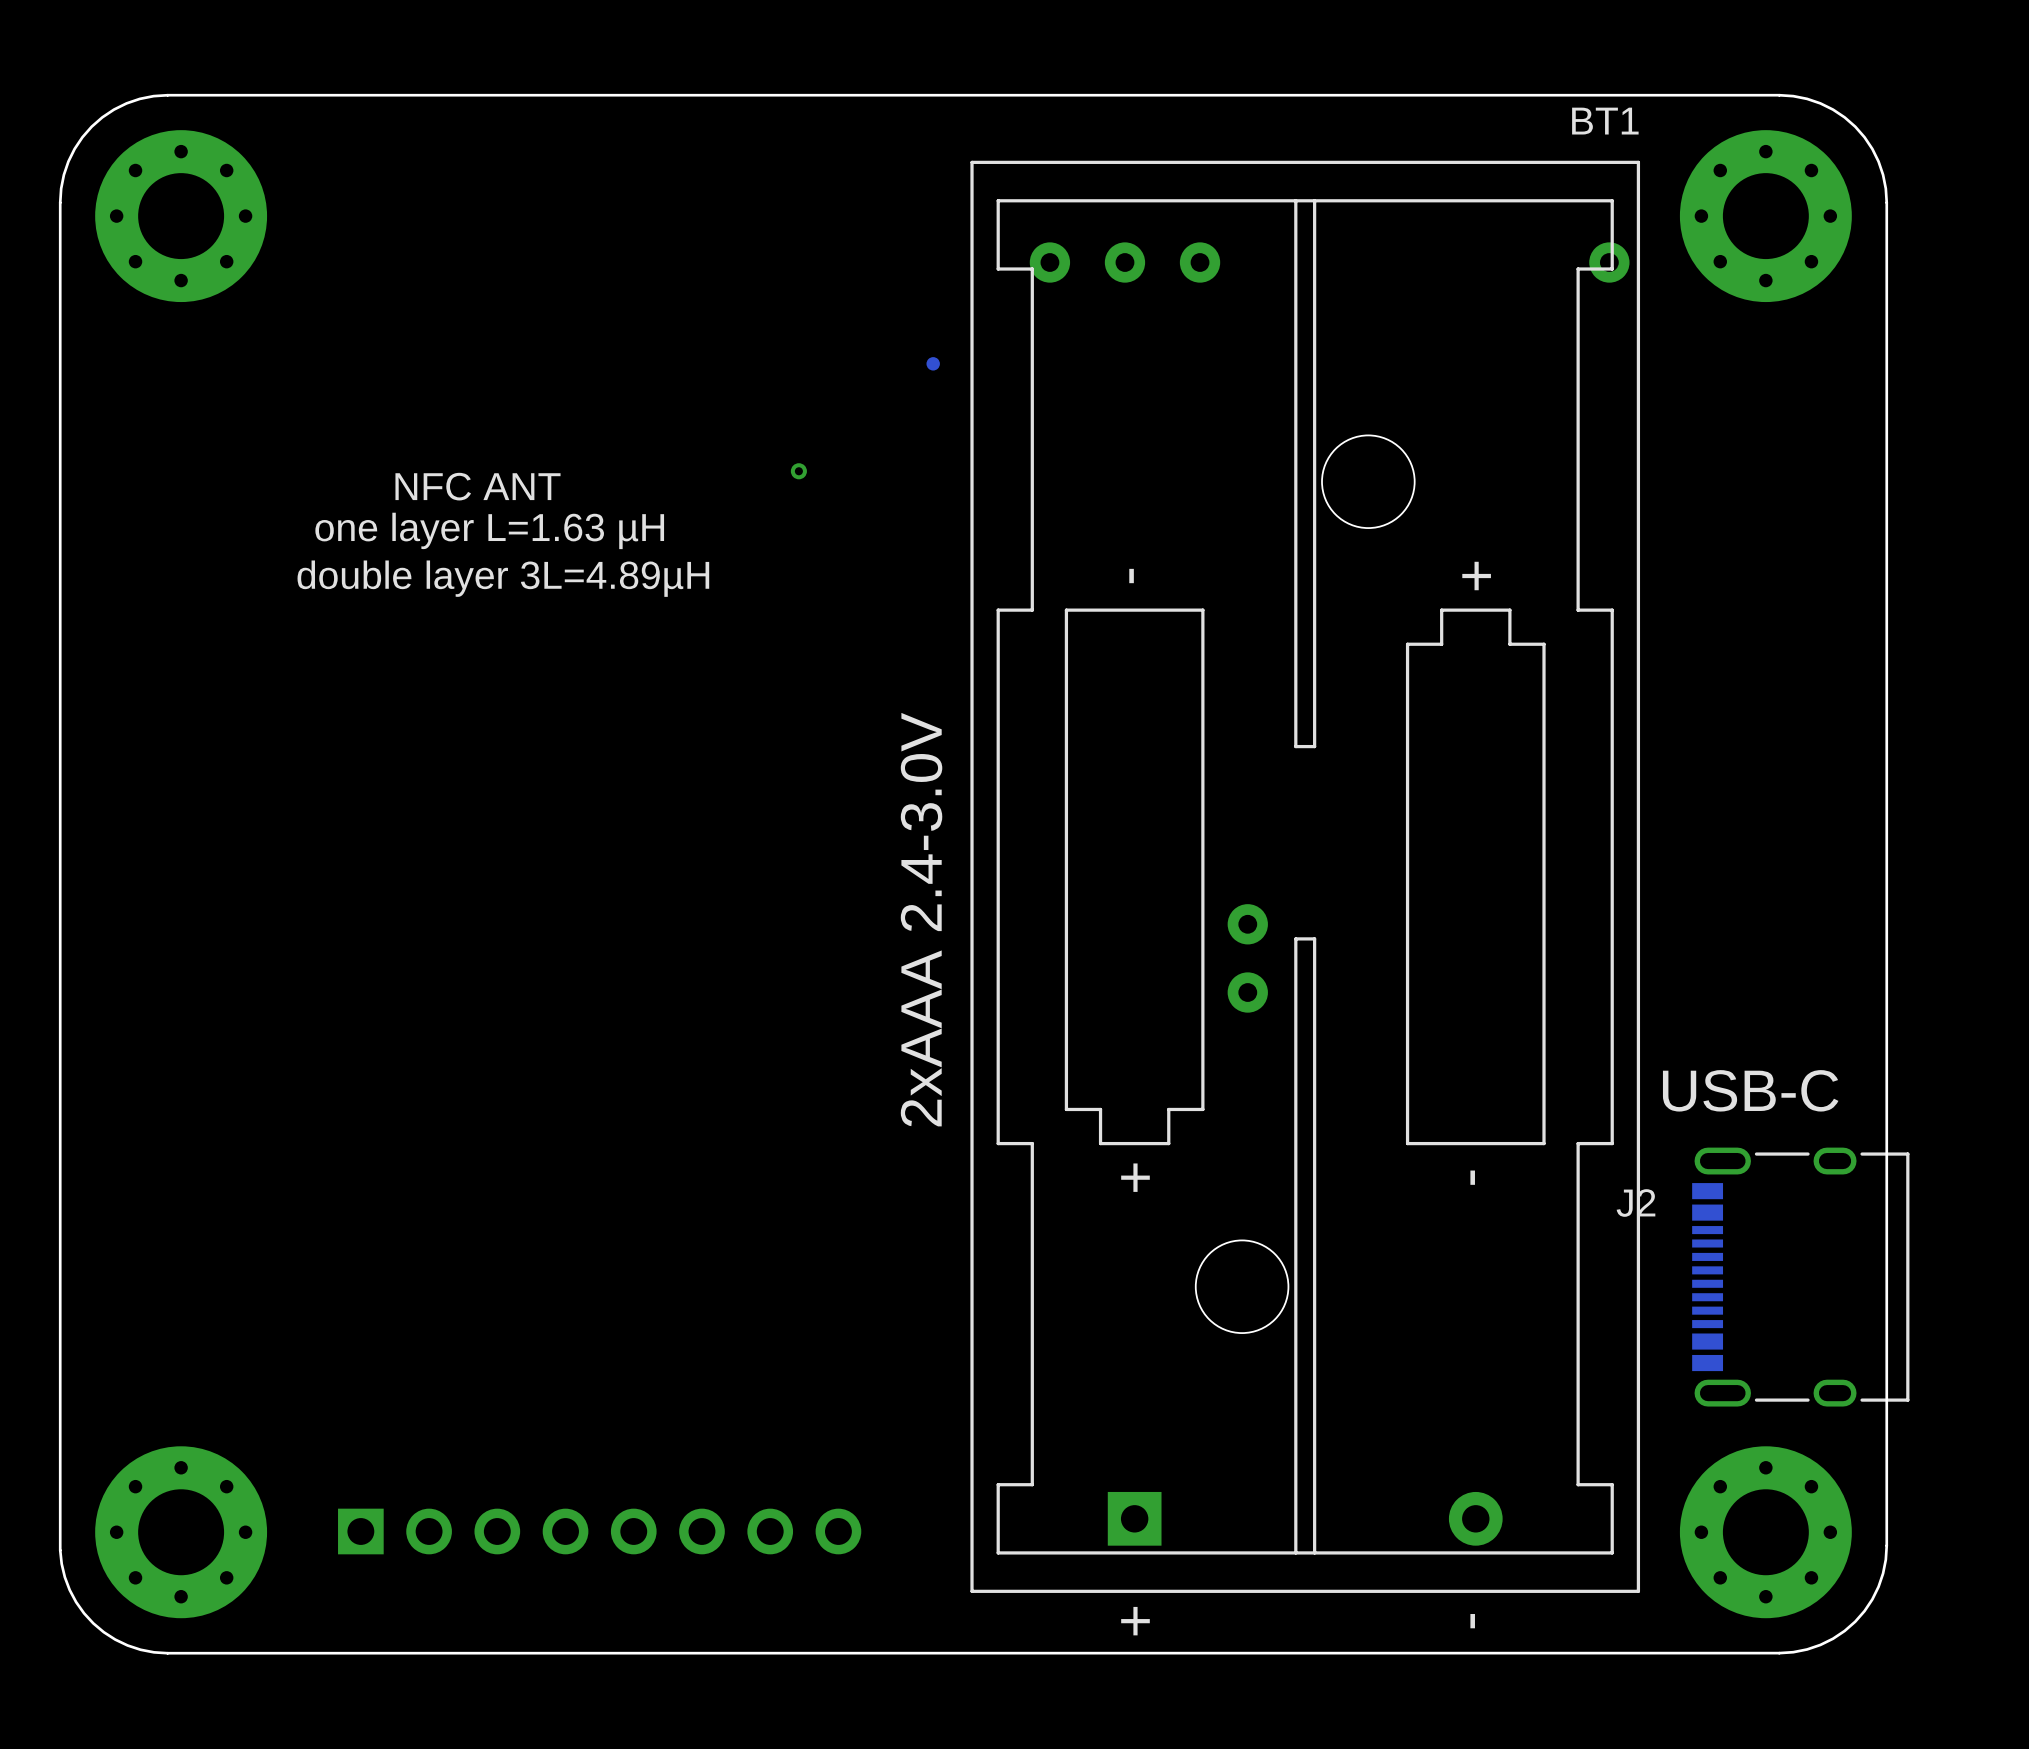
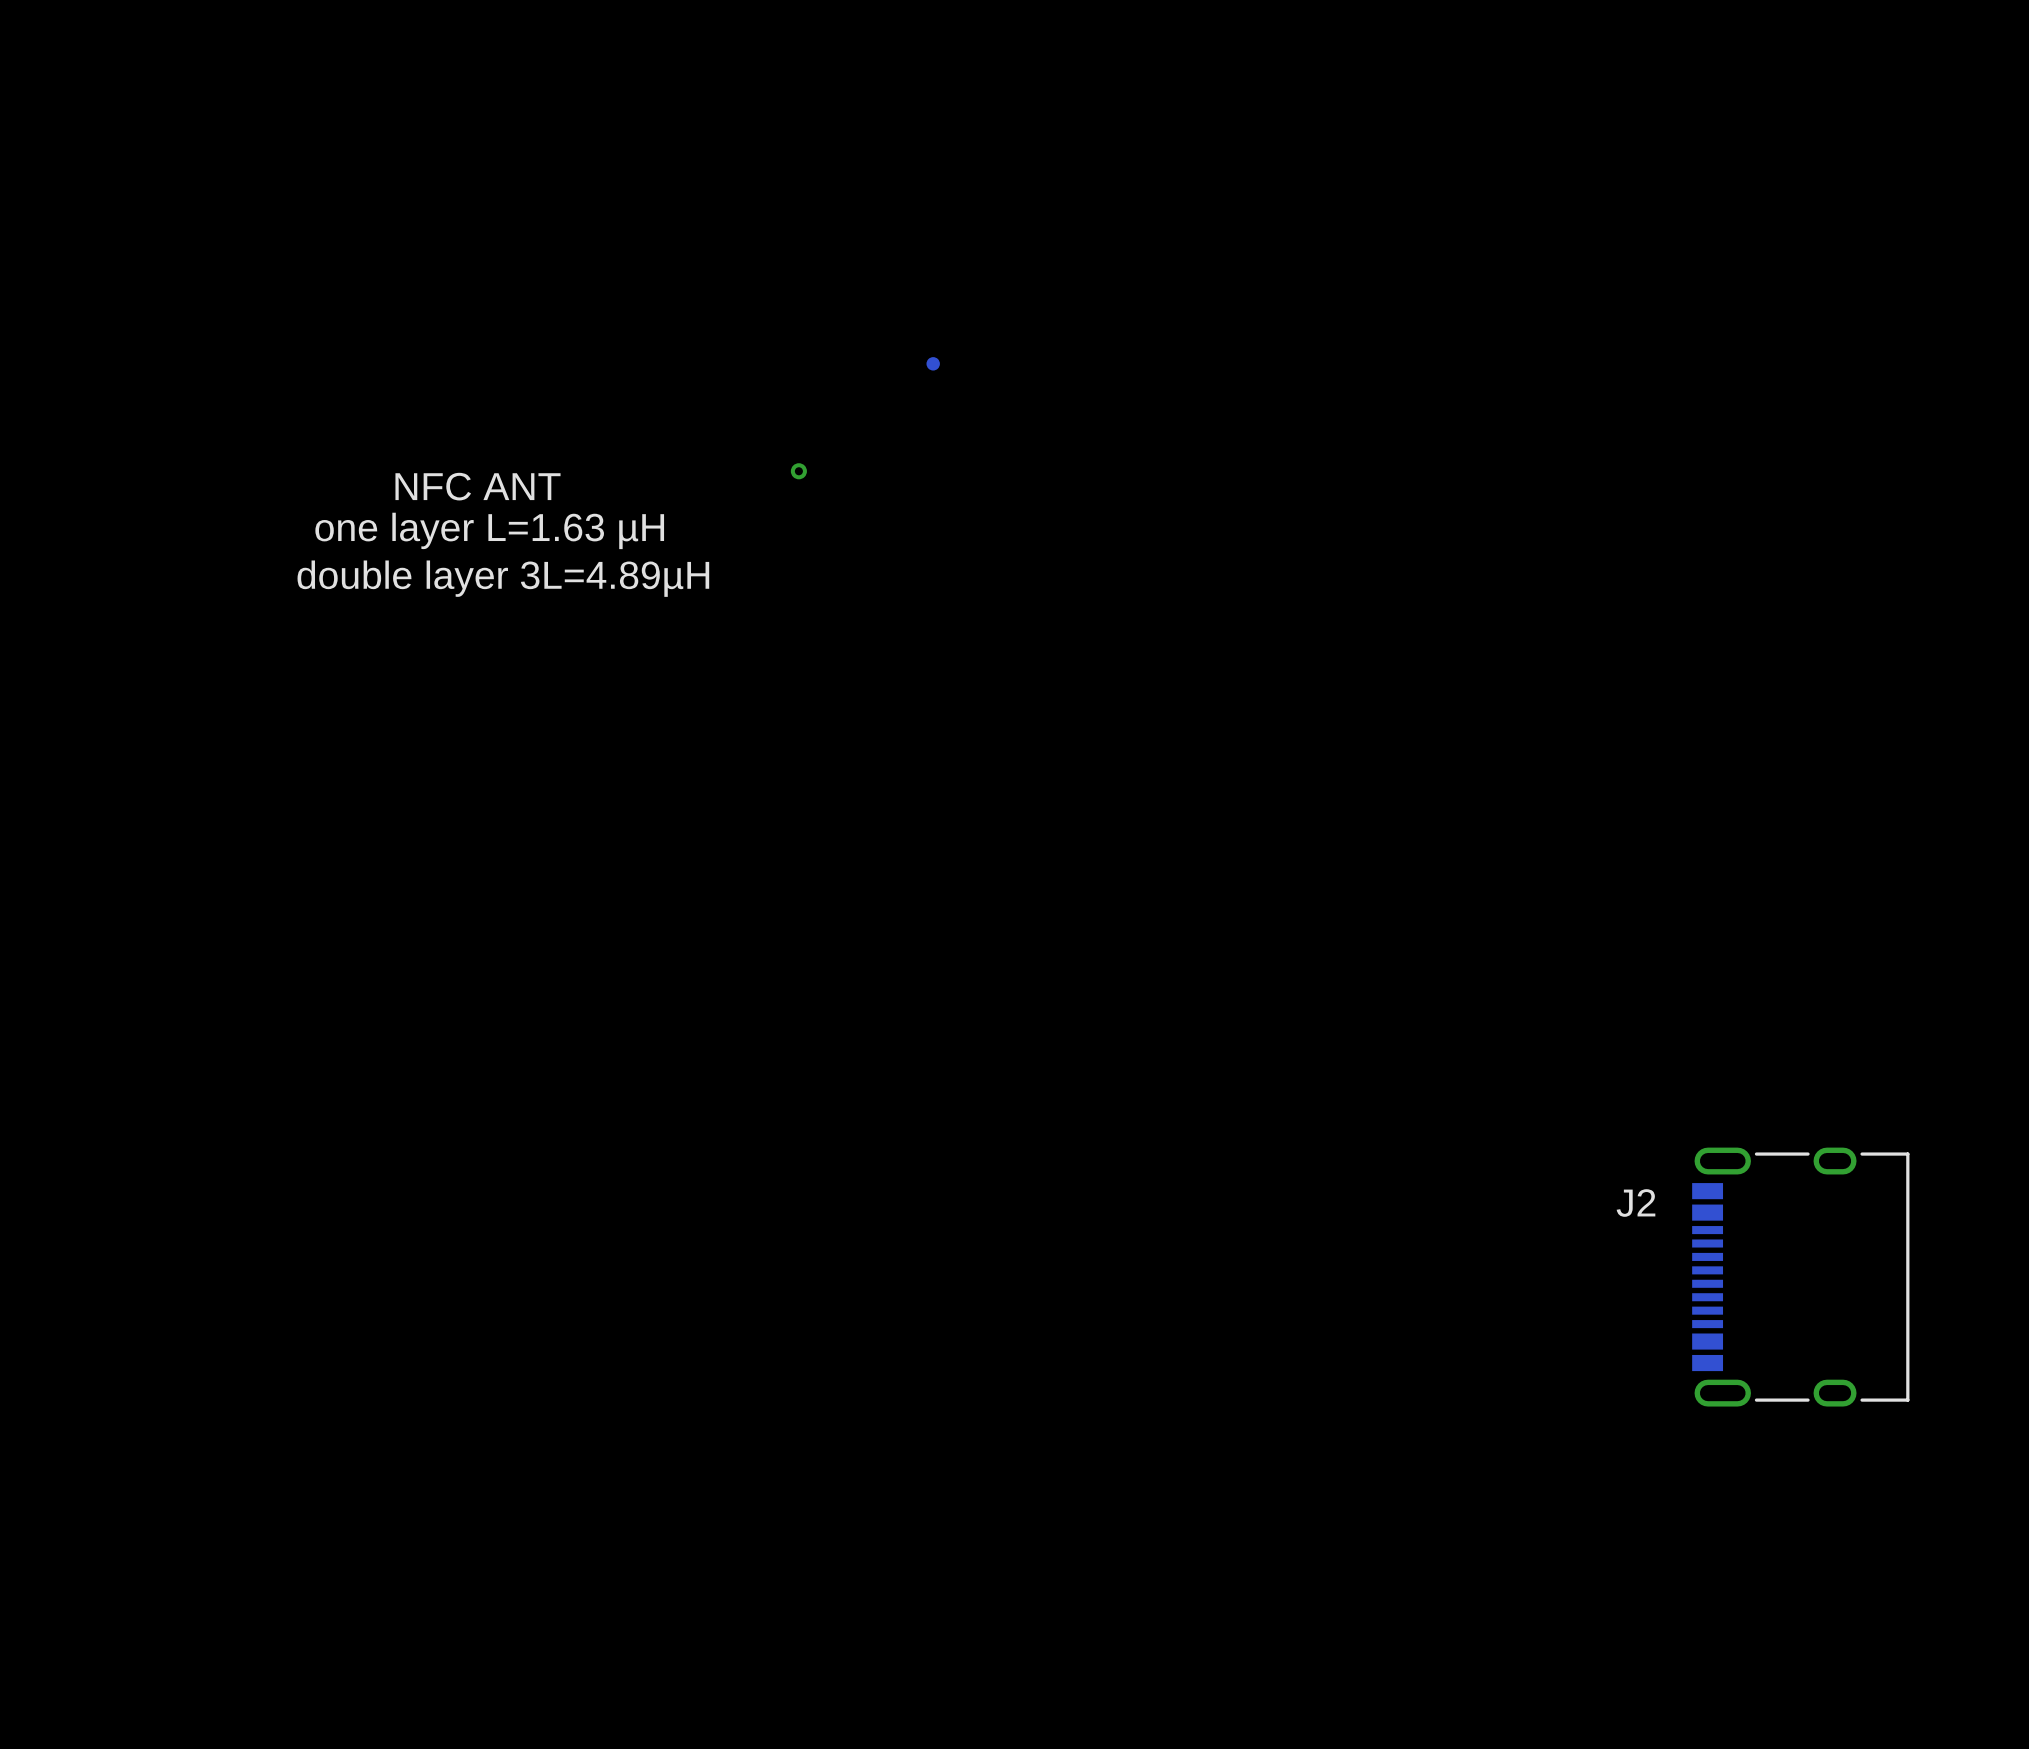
board edge: (1779, 95) (167, 95) (153, 96) (126, 103) (113, 109) (91, 126) (74, 148) (68, 161) (61, 188) (60, 202) (60, 1550) (64, 1577) (69, 1590) (84, 1613) (103, 1632) (127, 1645) (154, 1652) (167, 1653) (1779, 1653) (1807, 1649) (1820, 1644) (1833, 1638) (1855, 1621) (1864, 1611) (1878, 1586) (1885, 1559) (1886, 1545) (1886, 202) (1885, 188) (1878, 161) (1872, 148) (1855, 126) (1833, 109) (1820, 103) (1793, 96) (1779, 95) -> none
part: (181, 216) -> none
part: (1765, 216) -> none
part: (1049, 262) -> none
part: (1124, 262) -> none
part: (1200, 262) -> none
part: (1609, 262) -> none
BT1: (1305, 876) -> none
text: 2xAAA 2.4-3.0V (921, 919) -> none
part: (1247, 924) -> none
part: (1247, 992) -> none
text: USB-C (1750, 1090) -> none
part: (599, 1531) -> none
part: (181, 1532) -> none
part: (1765, 1532) -> none

